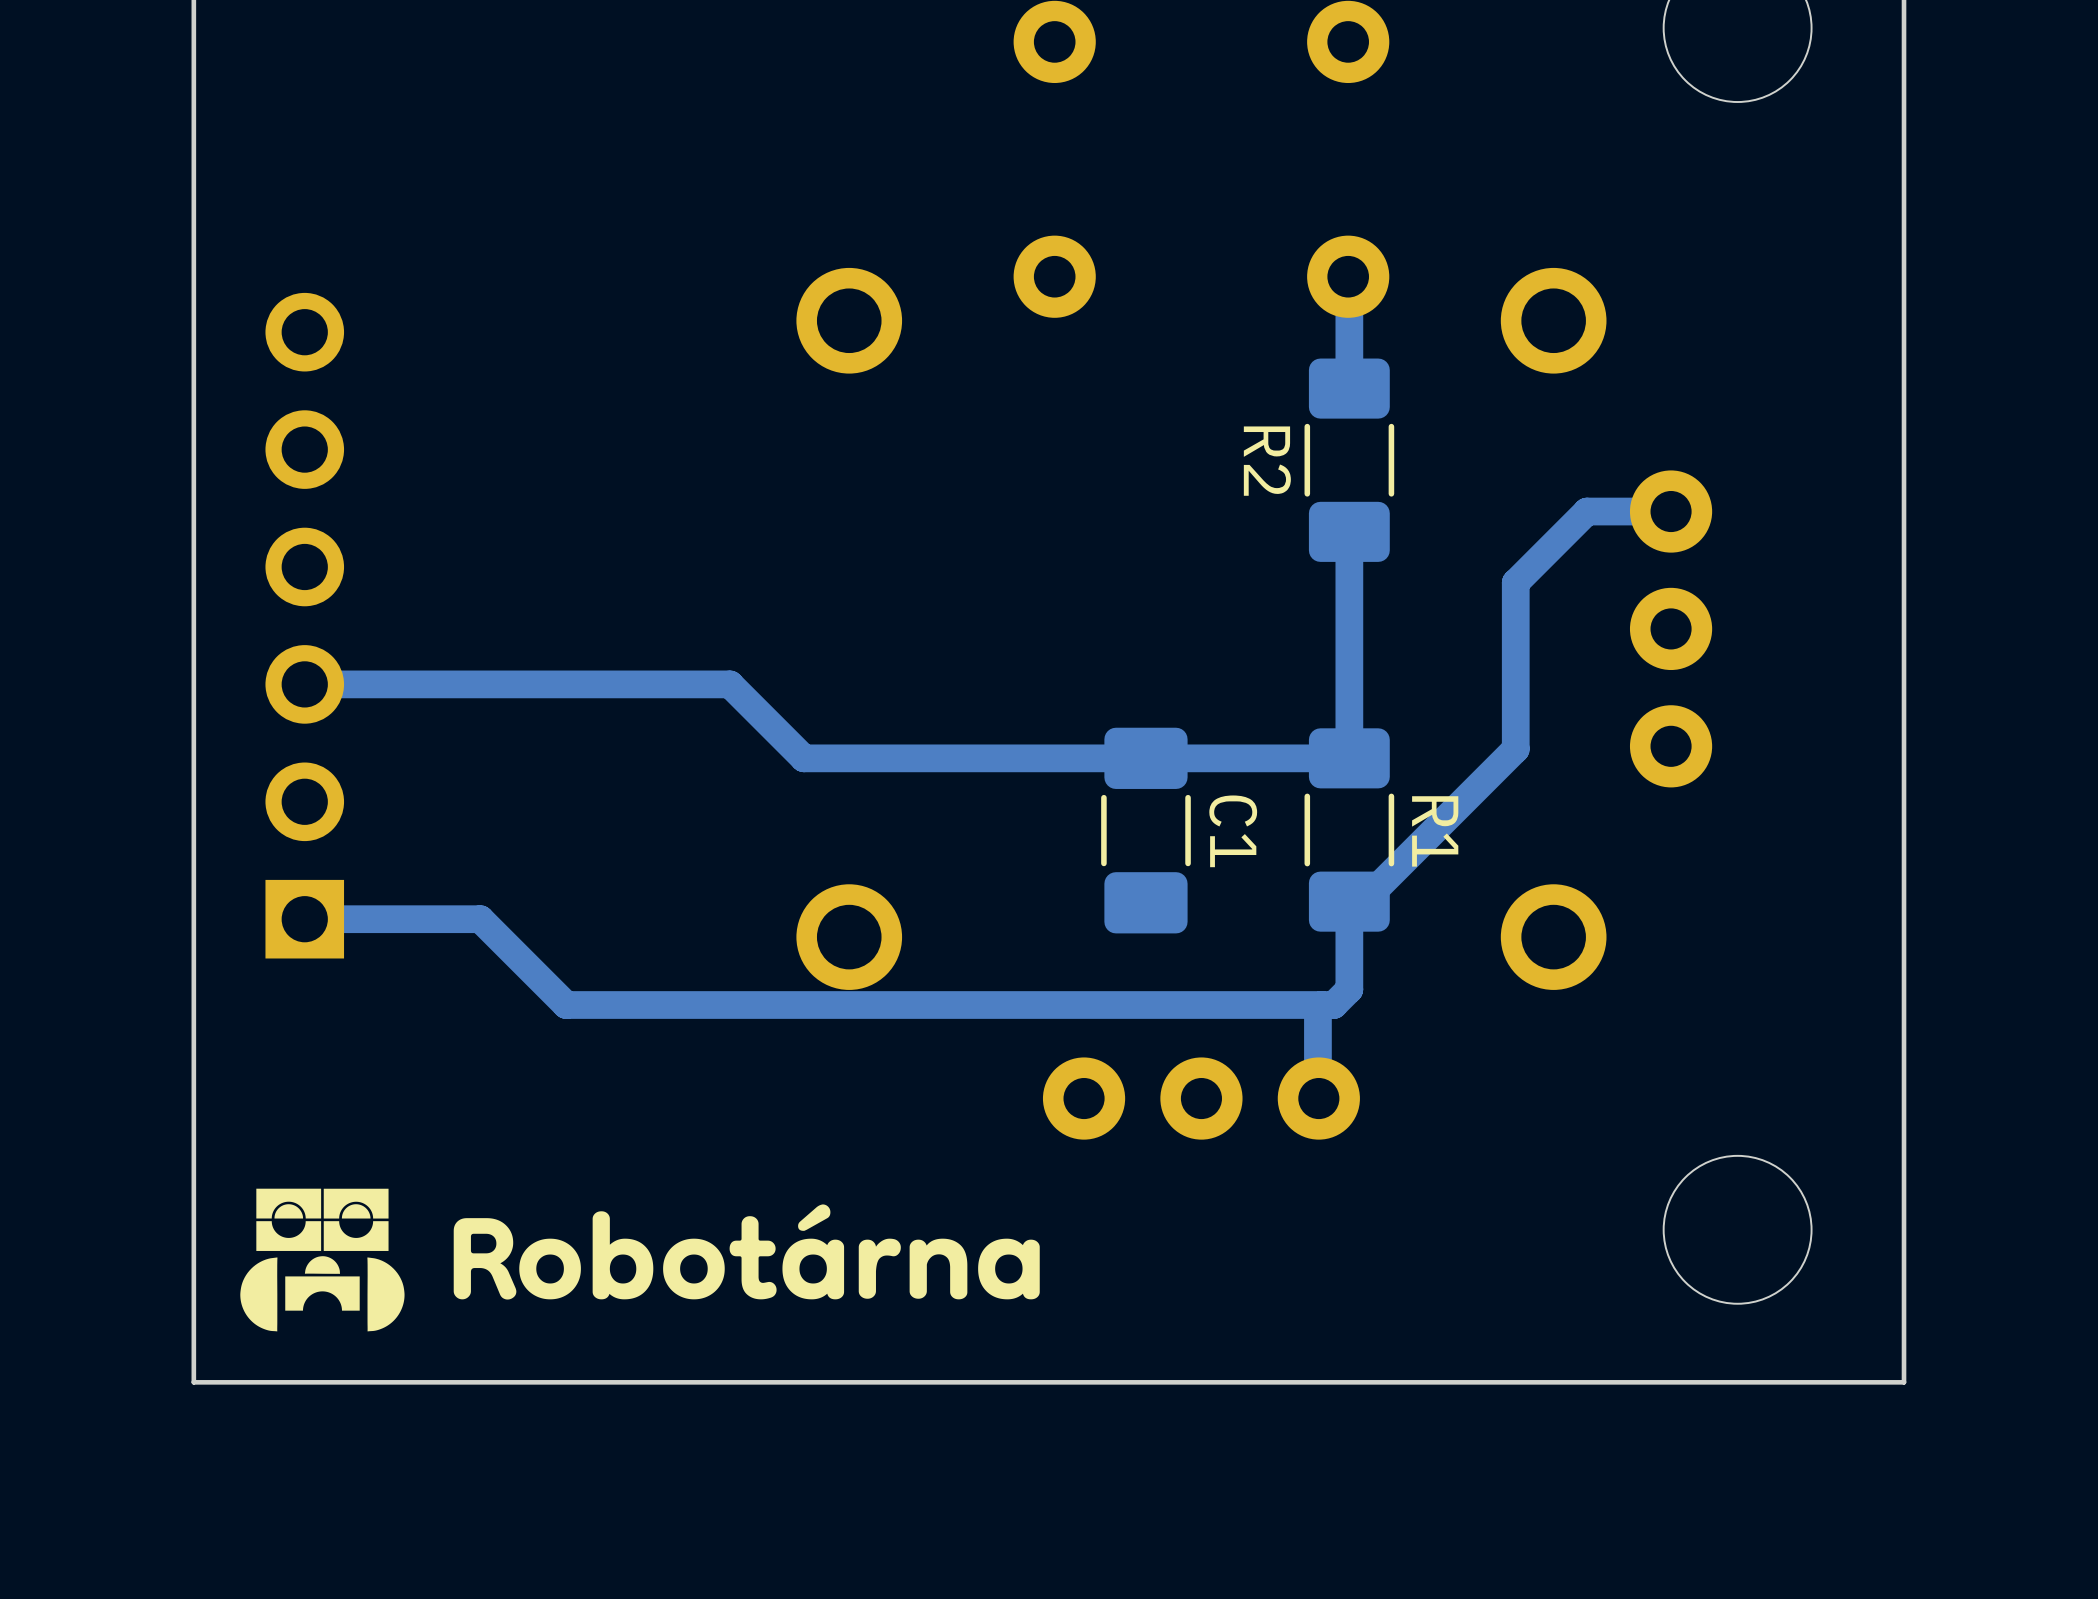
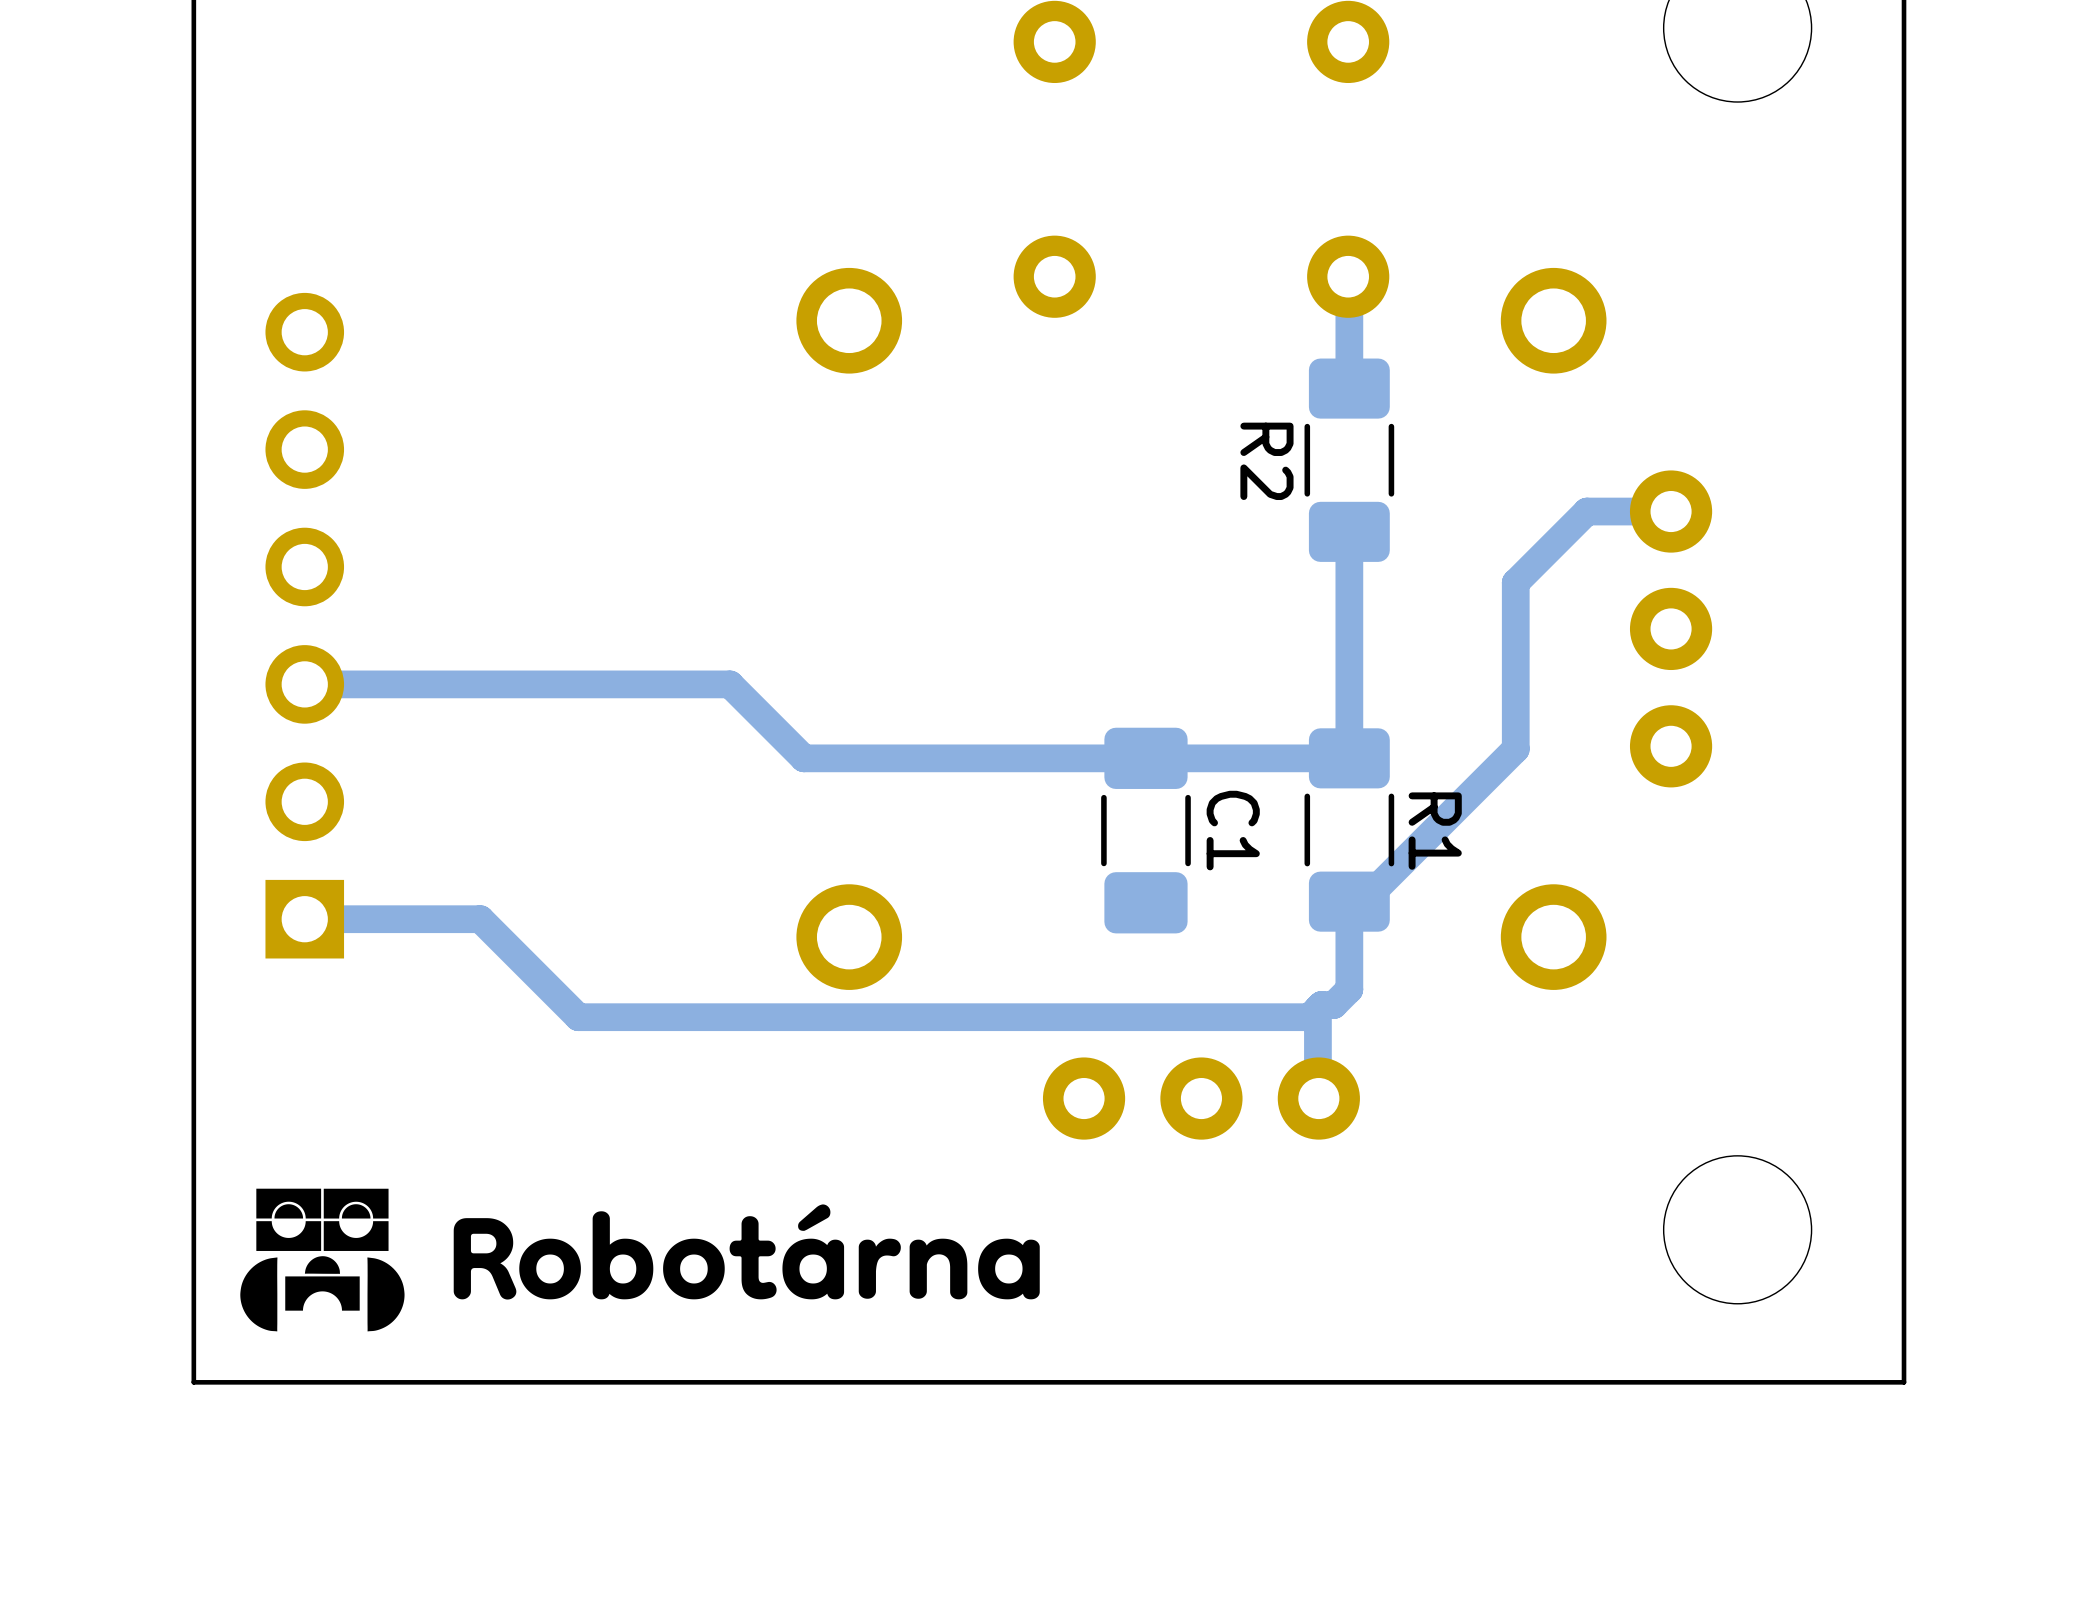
track: (1321, 1005) (566, 1005) -> (1317, 1008) (1309, 1017) (578, 1017) (566, 1005)

